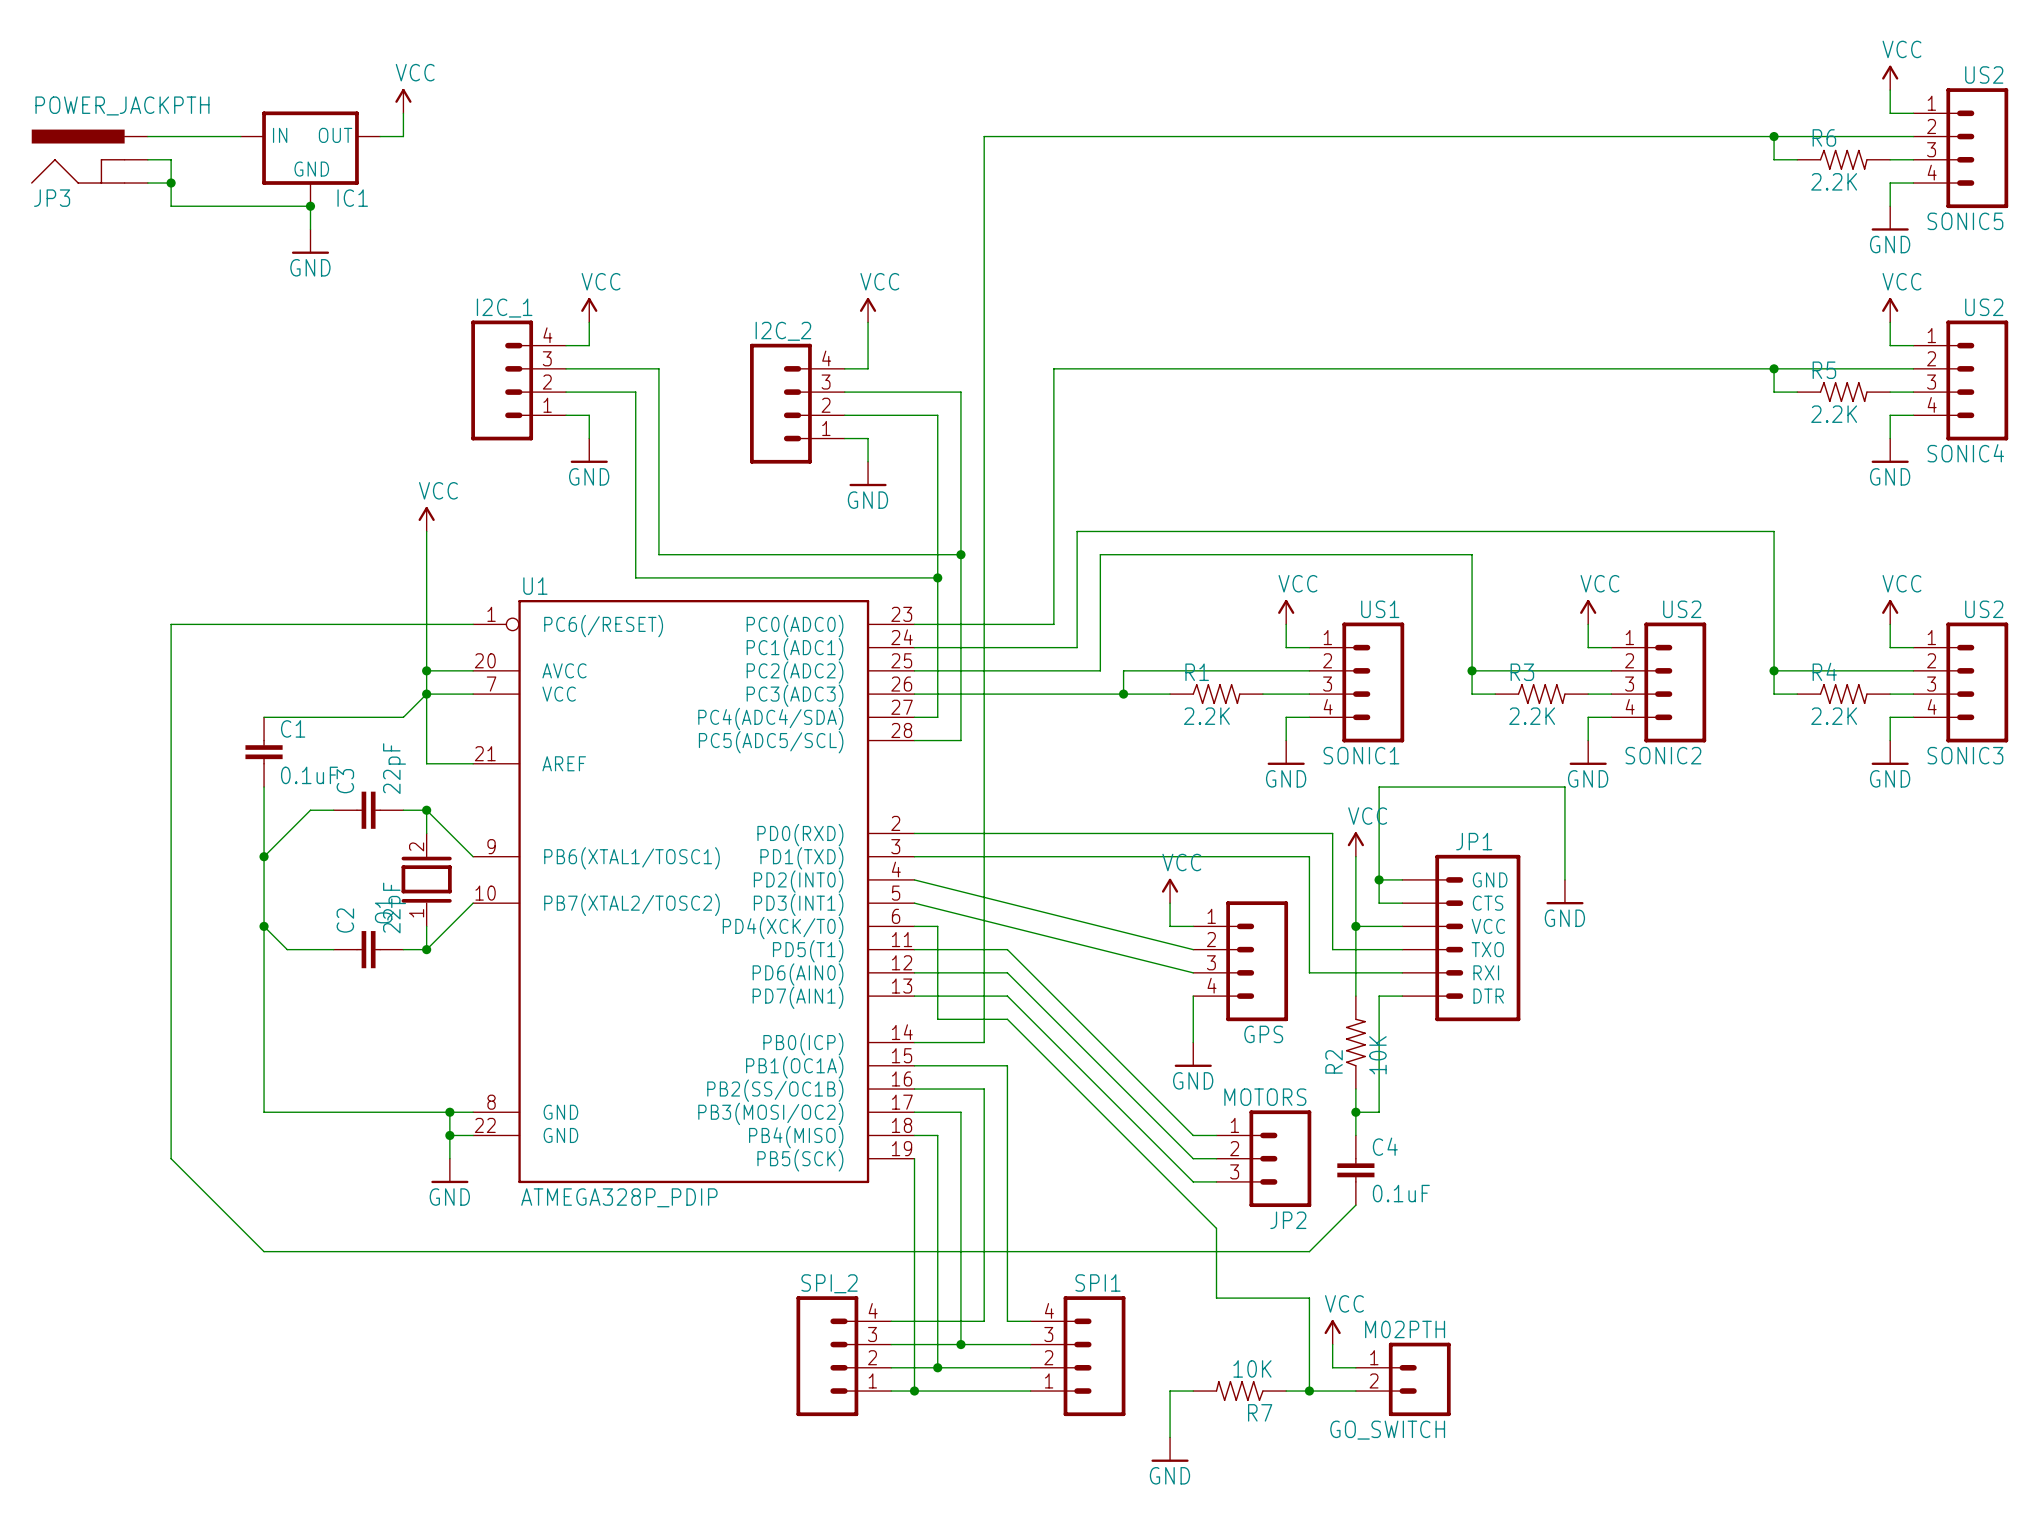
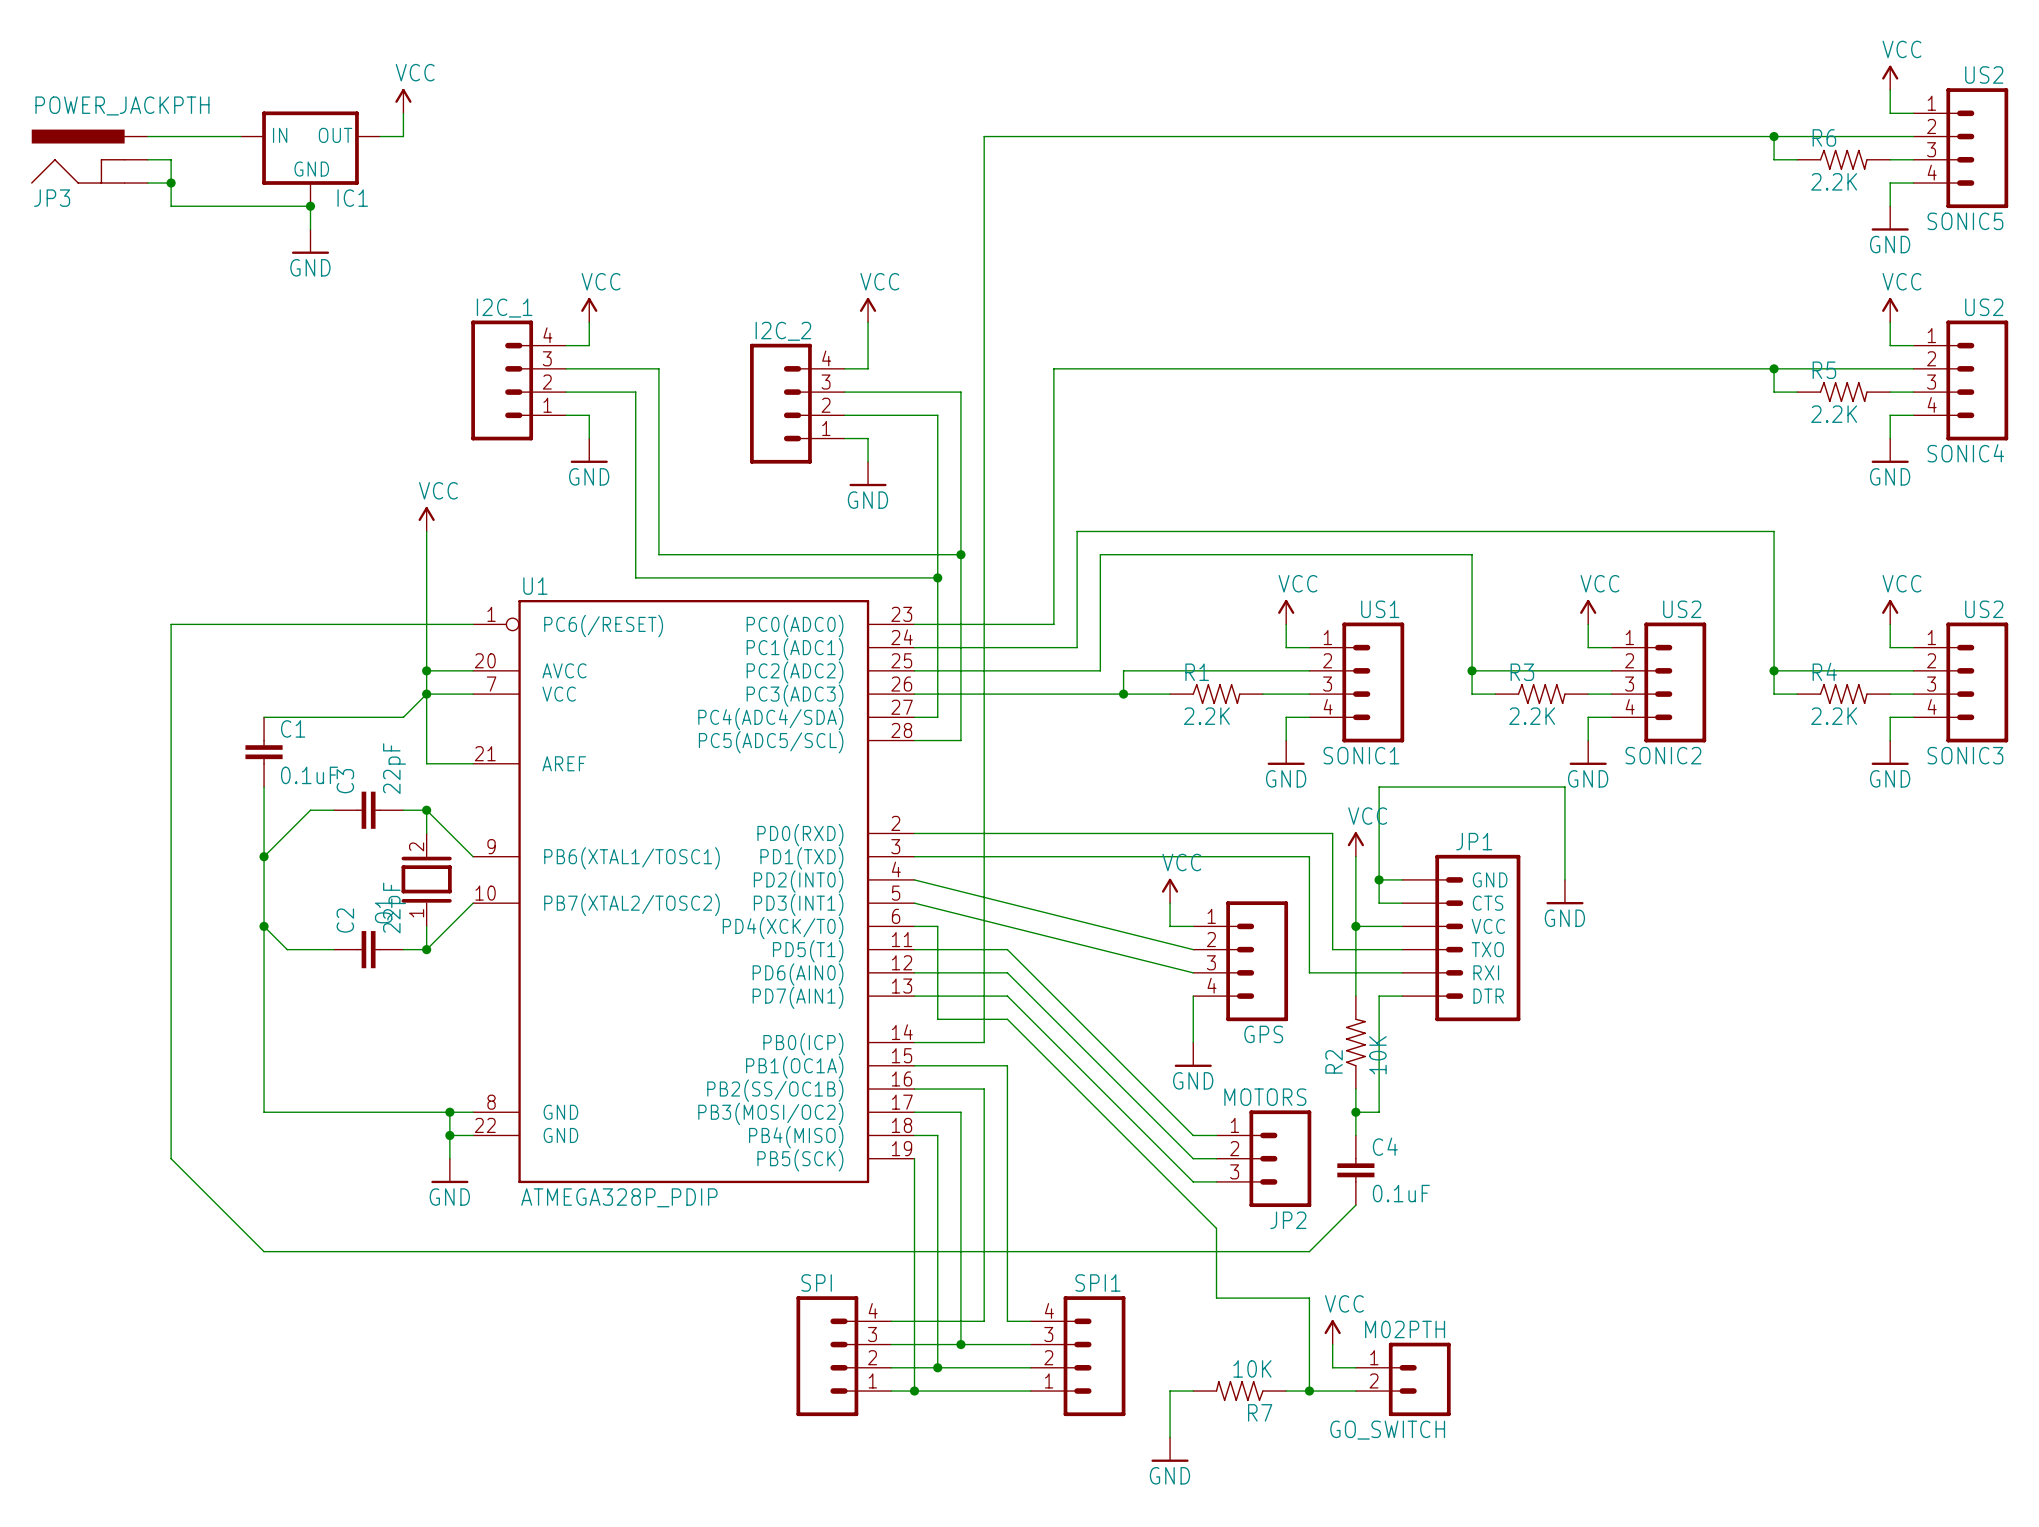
SPI_2 name: SPI_2 (829, 1283) -> SPI (816, 1282)

